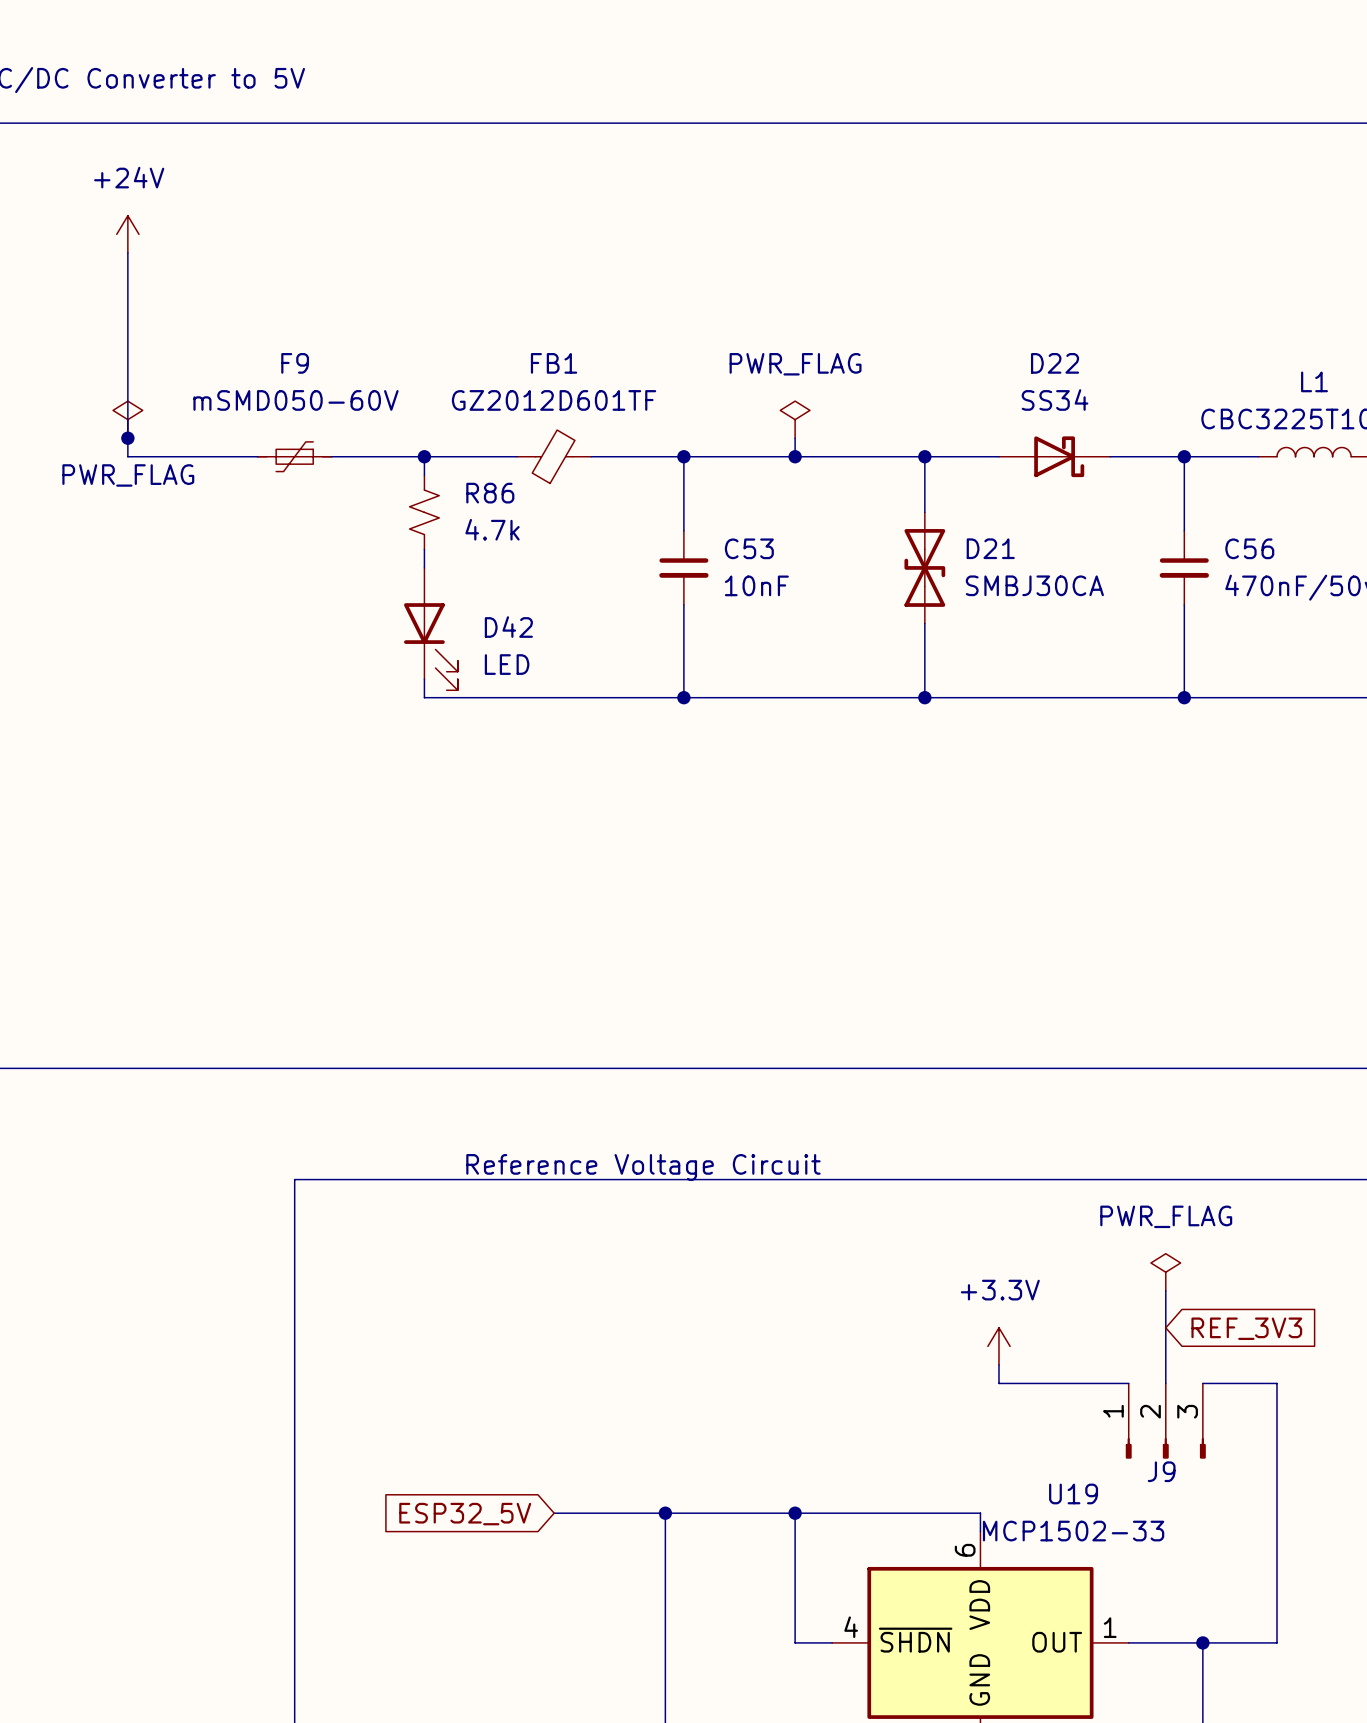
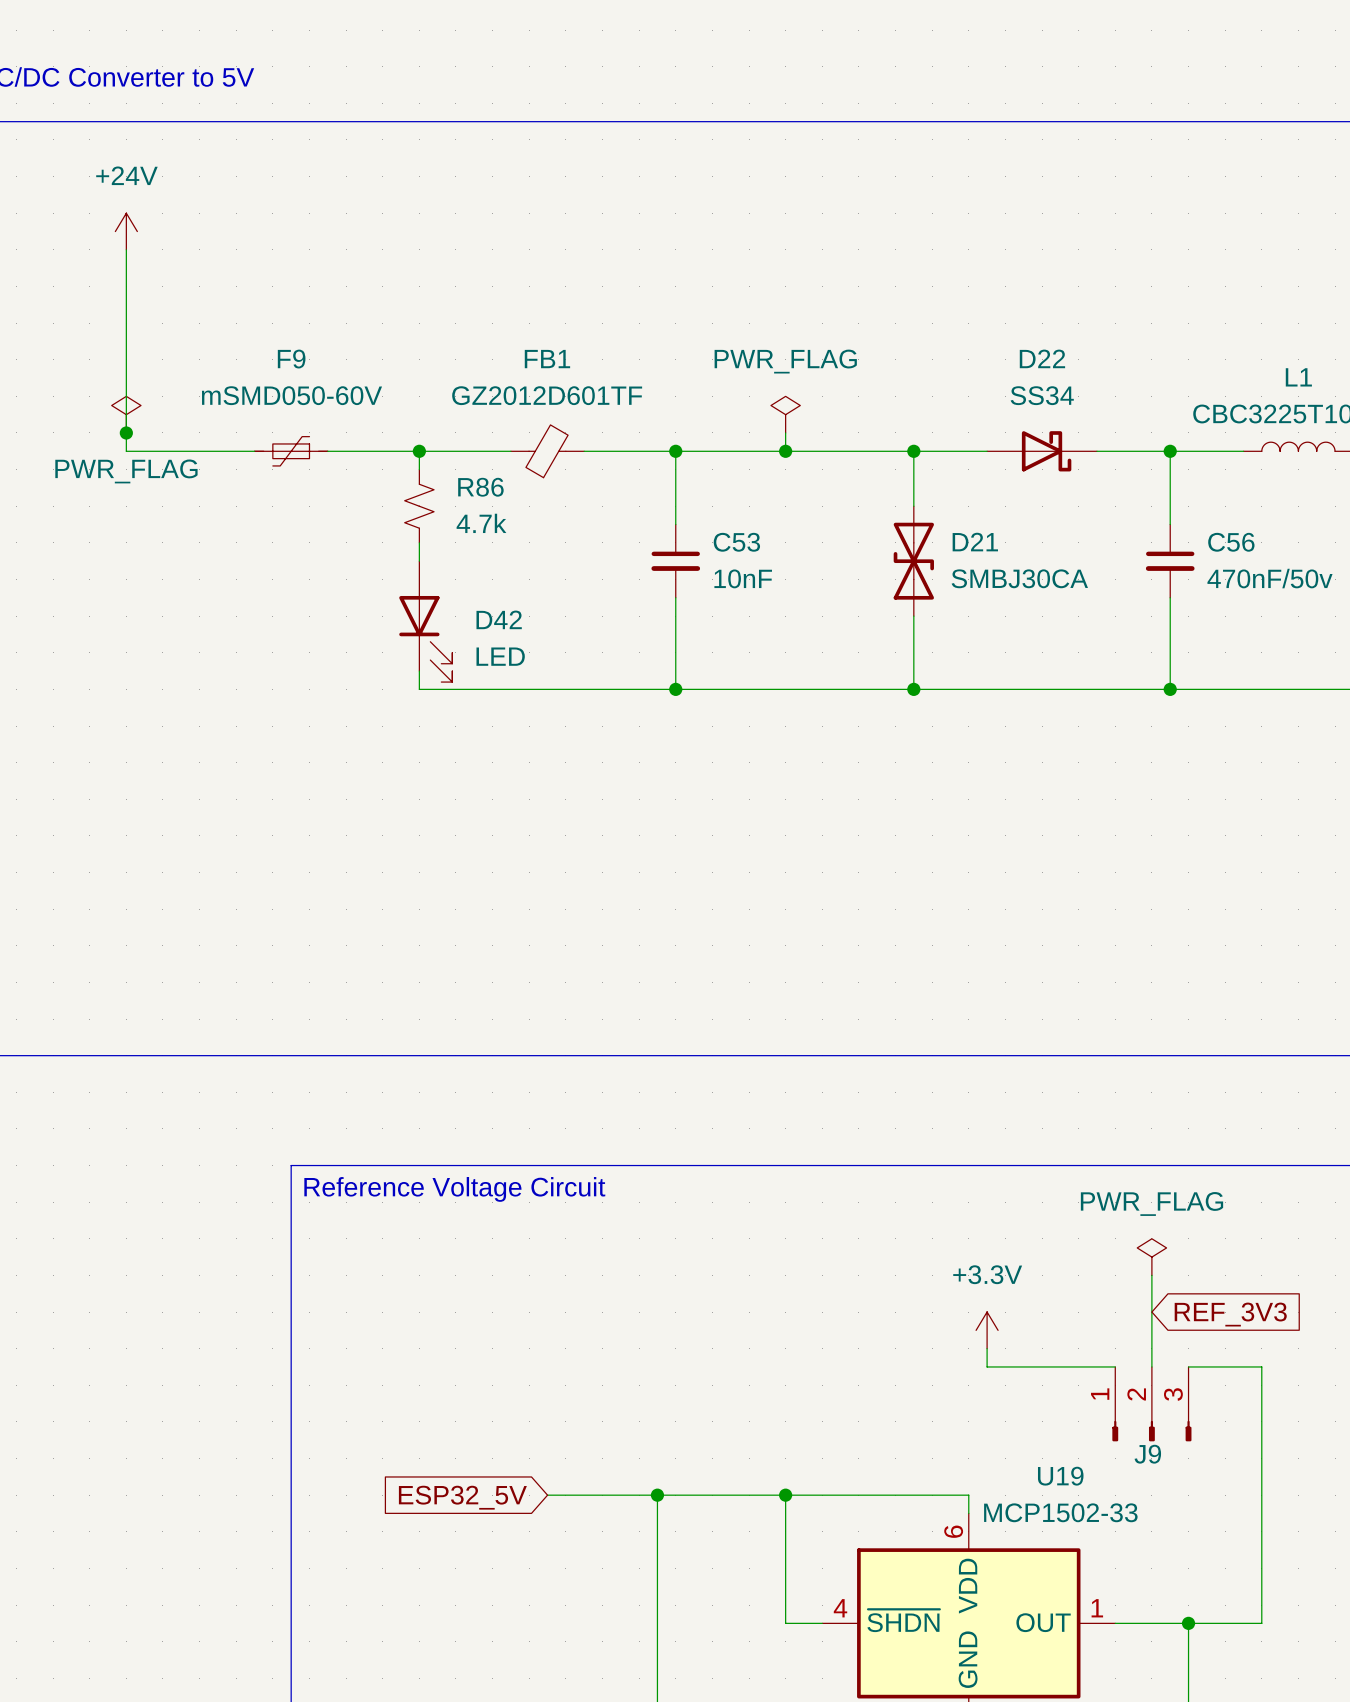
text position: Reference Voltage Circuit (643, 1167) -> Reference Voltage Circuit (454, 1189)

